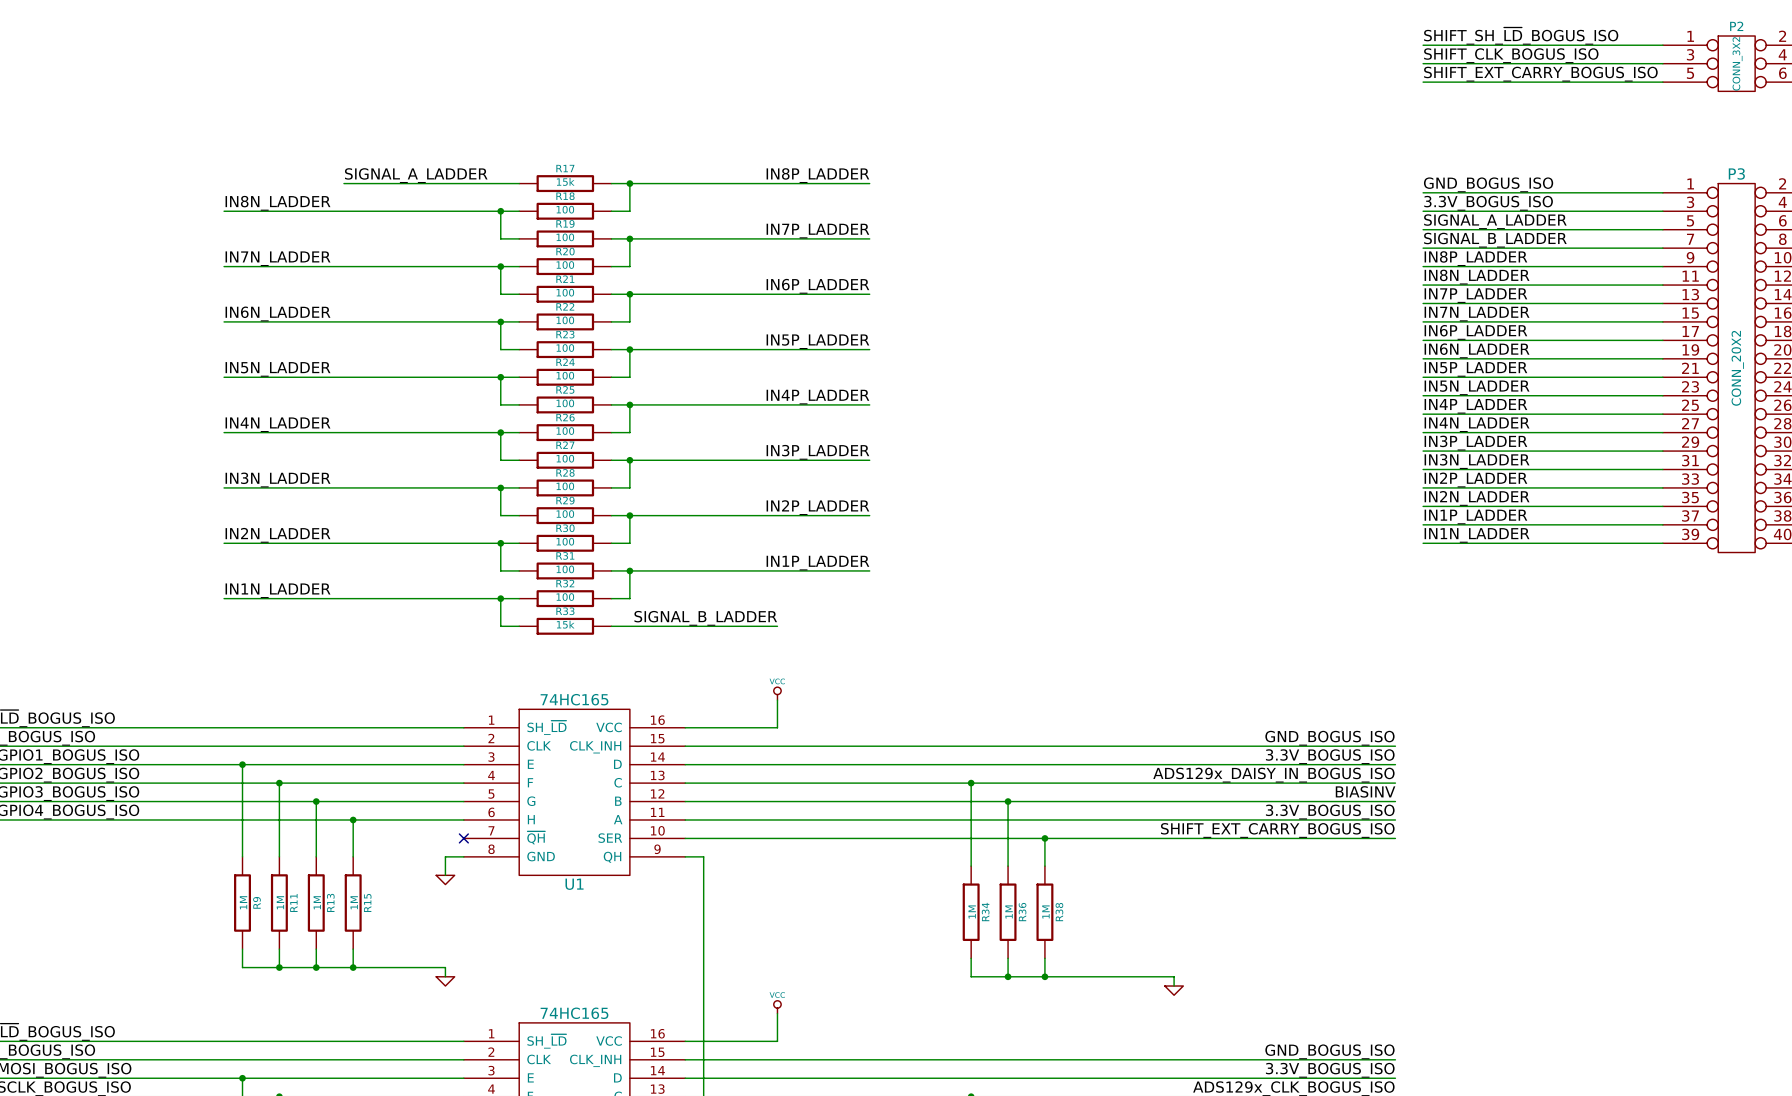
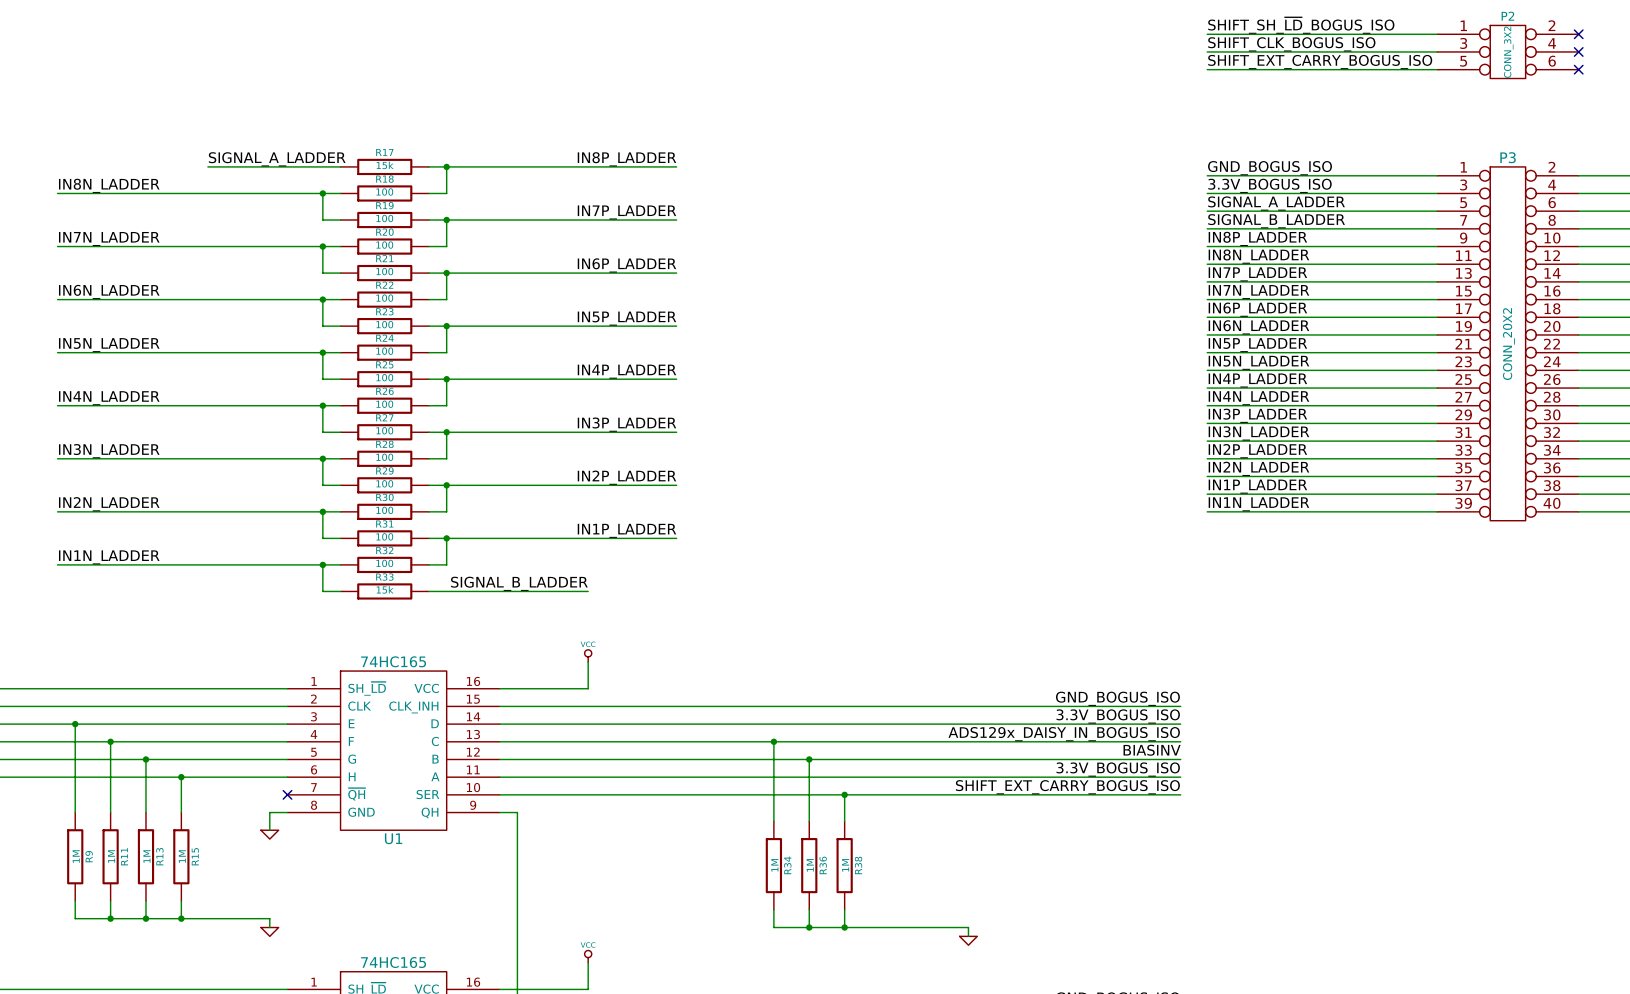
label position: SIGNAL_A_LADDER (416, 175) -> SIGNAL_A_LADDER (277, 159)
wire: (343, 183) (380, 183) -> none

